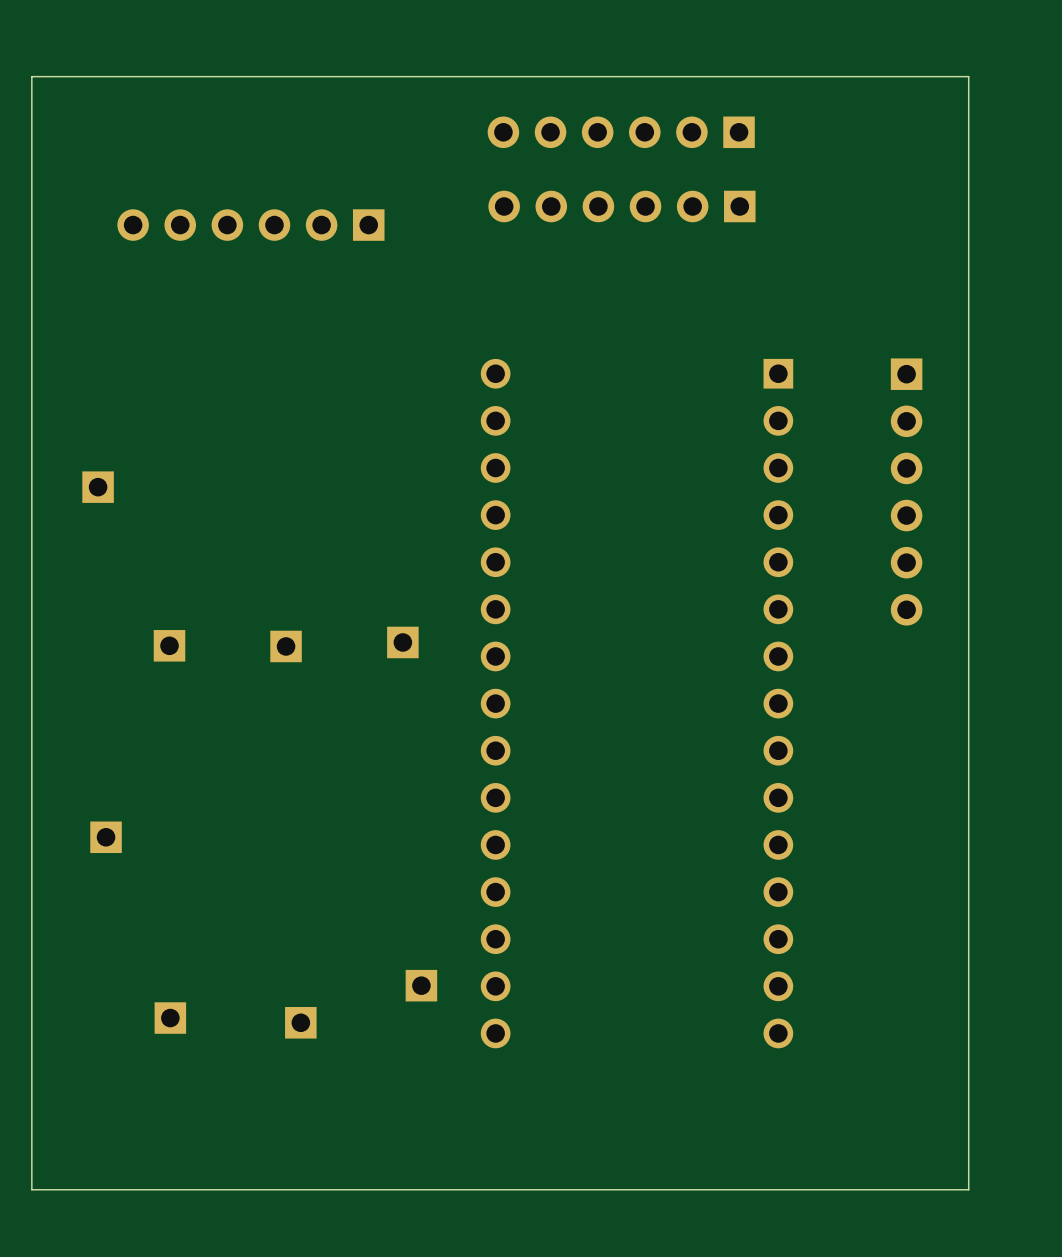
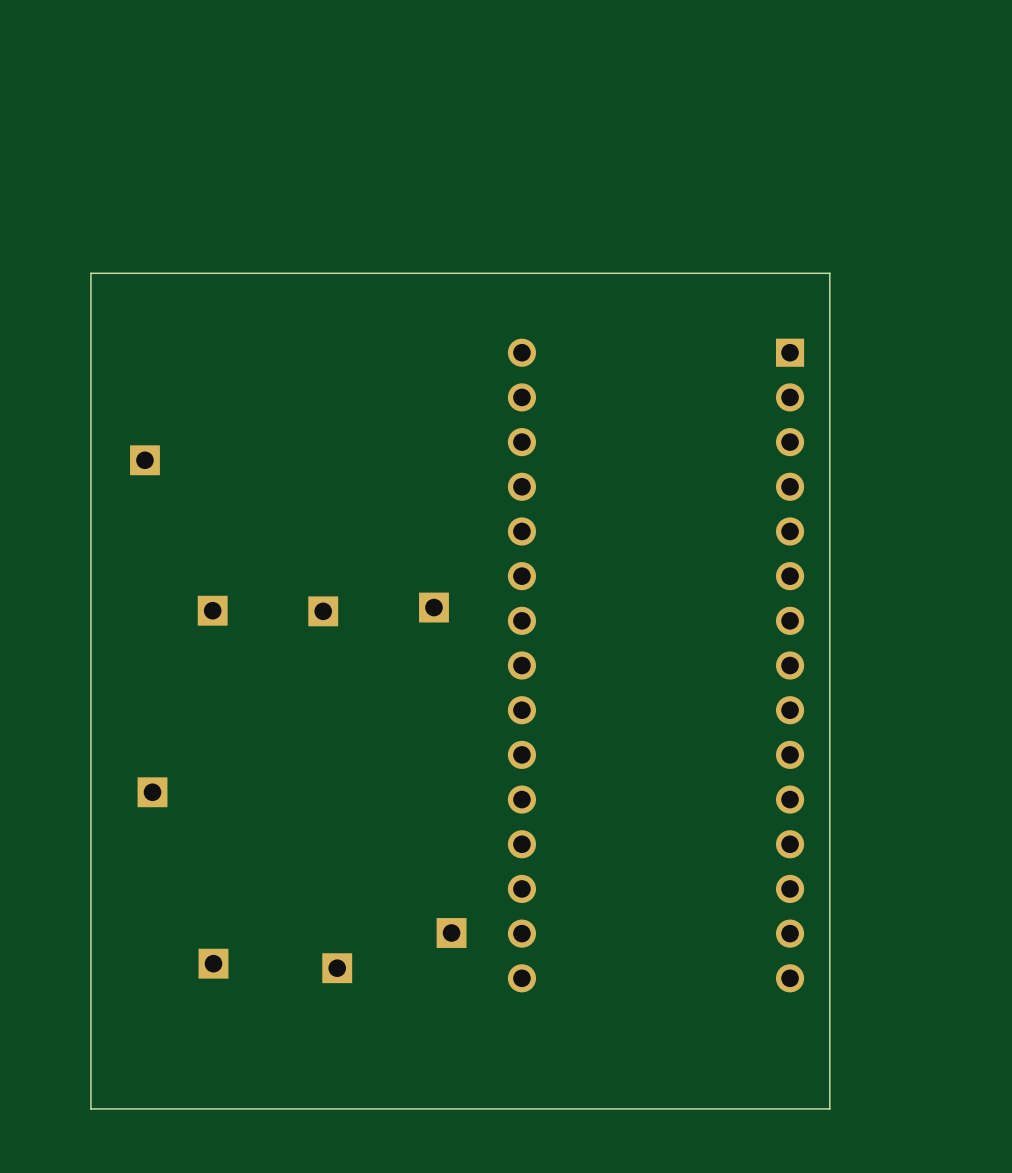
board edge: (968, 76) (31, 76) (31, 1189) (968, 1189) (968, 76) -> (829, 273) (829, 1108) (90, 1108) (90, 273) (829, 273)
part: (621, 132) -> none
part: (621, 206) -> none
part: (250, 225) -> none
part: (906, 491) -> none

